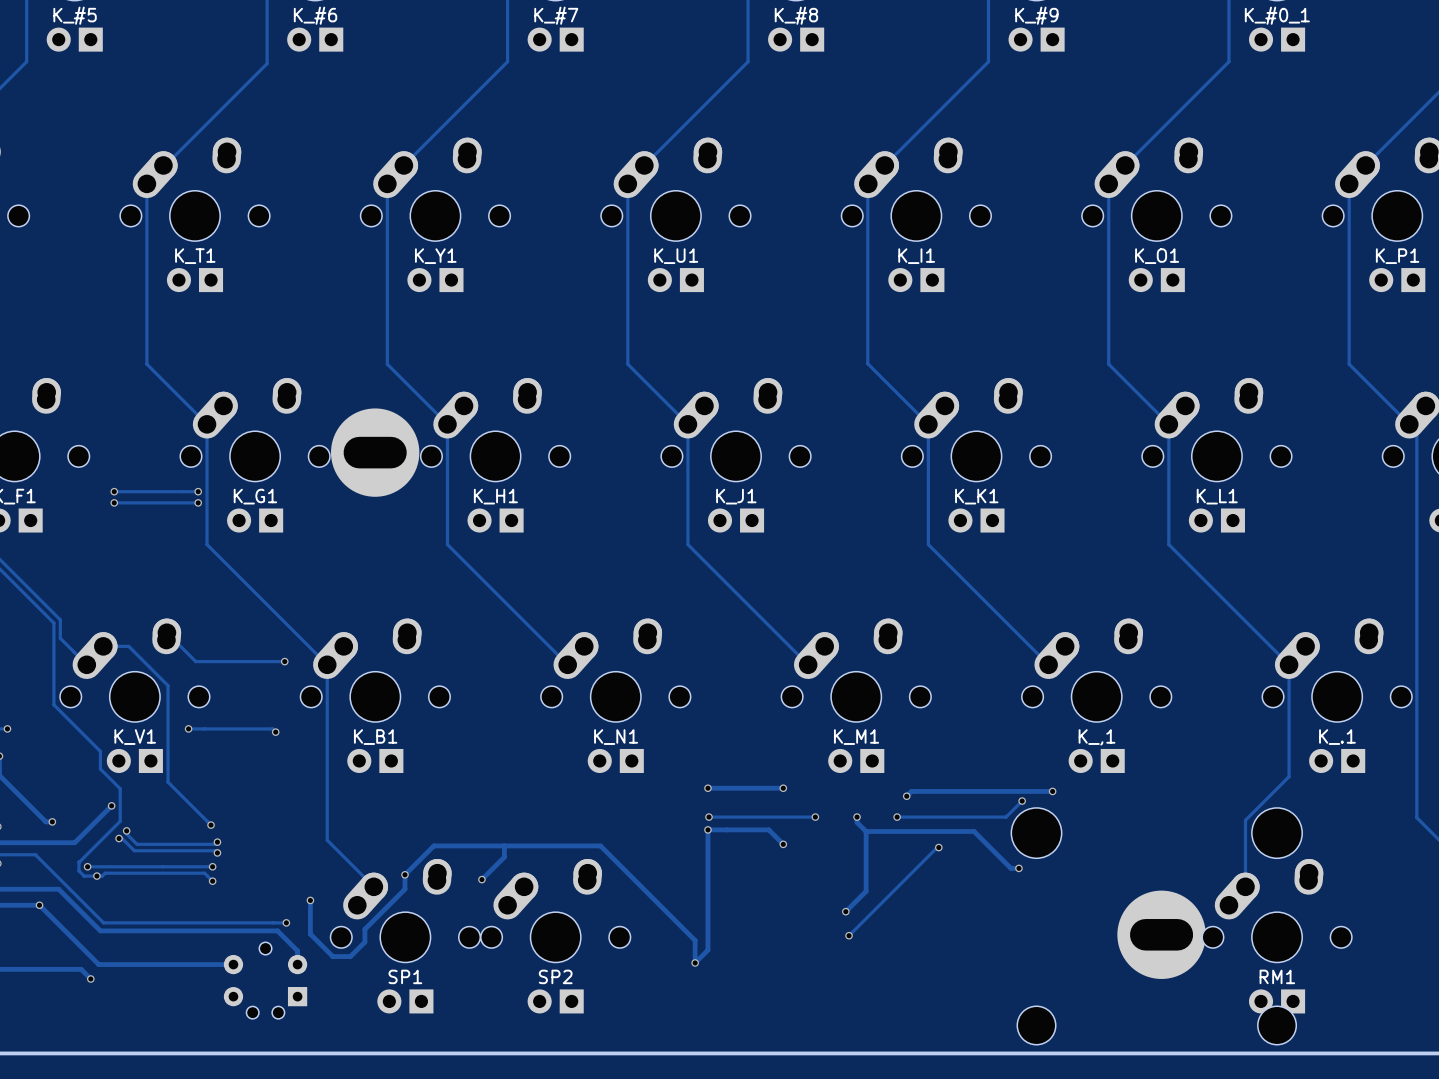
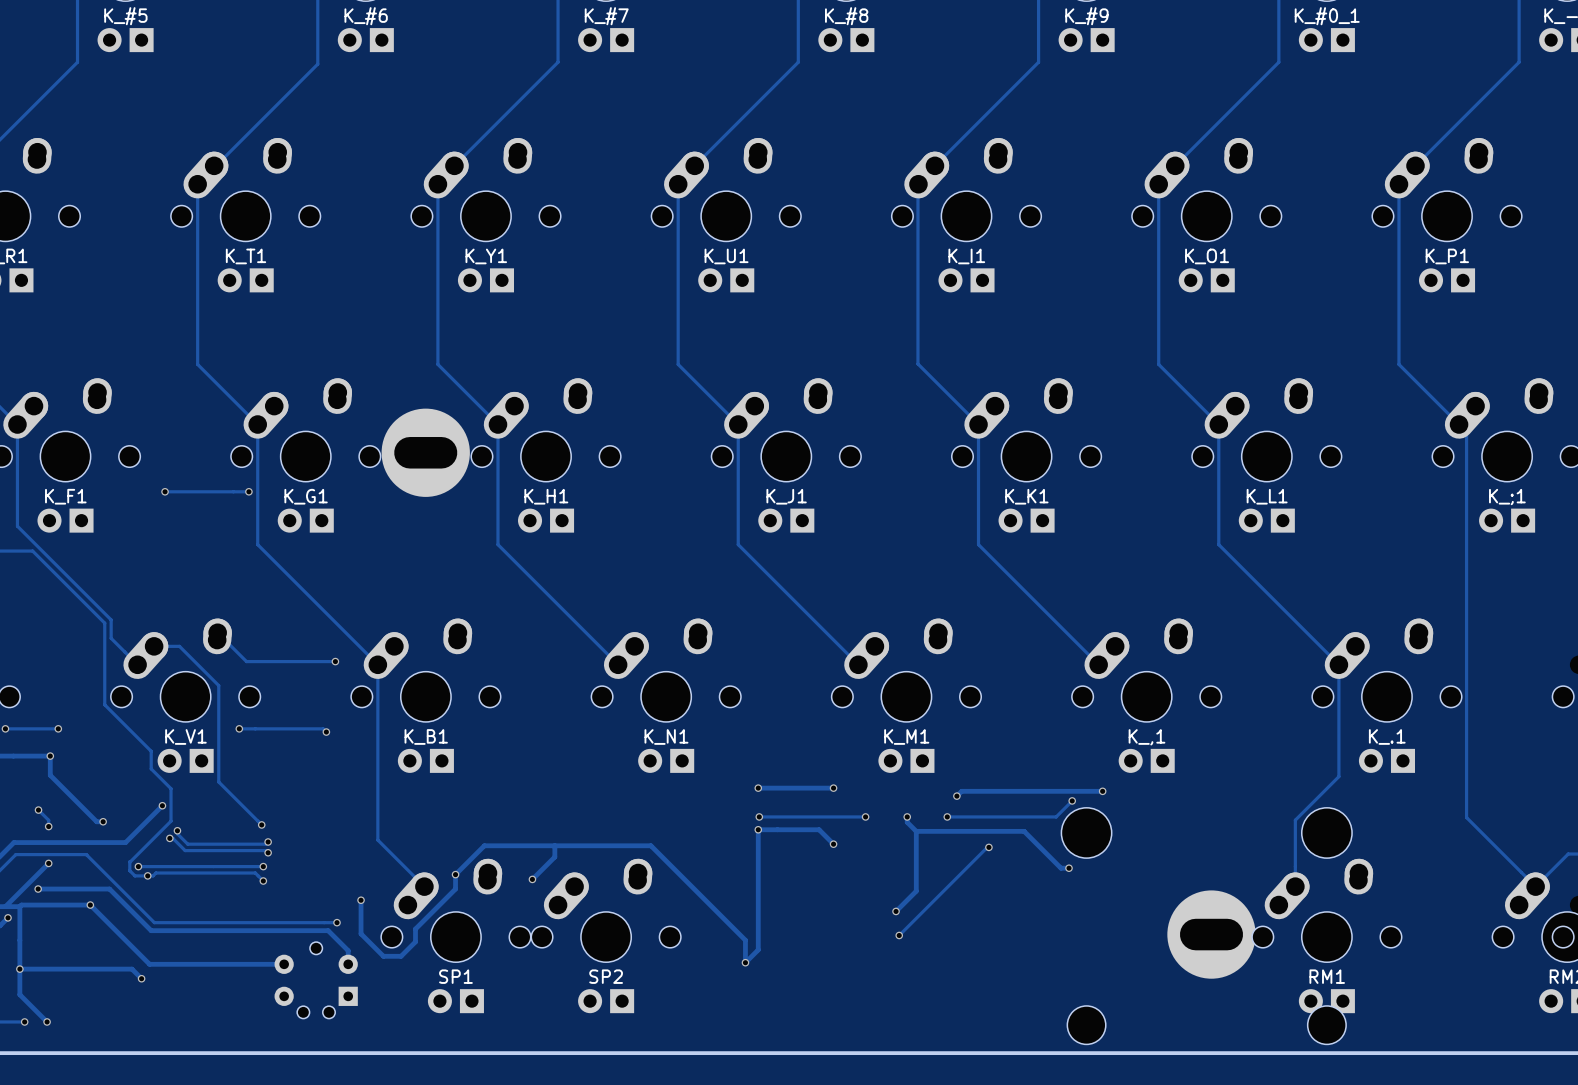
track: (114, 502) (198, 502) -> none
via: (114, 502) -> none
via: (198, 502) -> none

